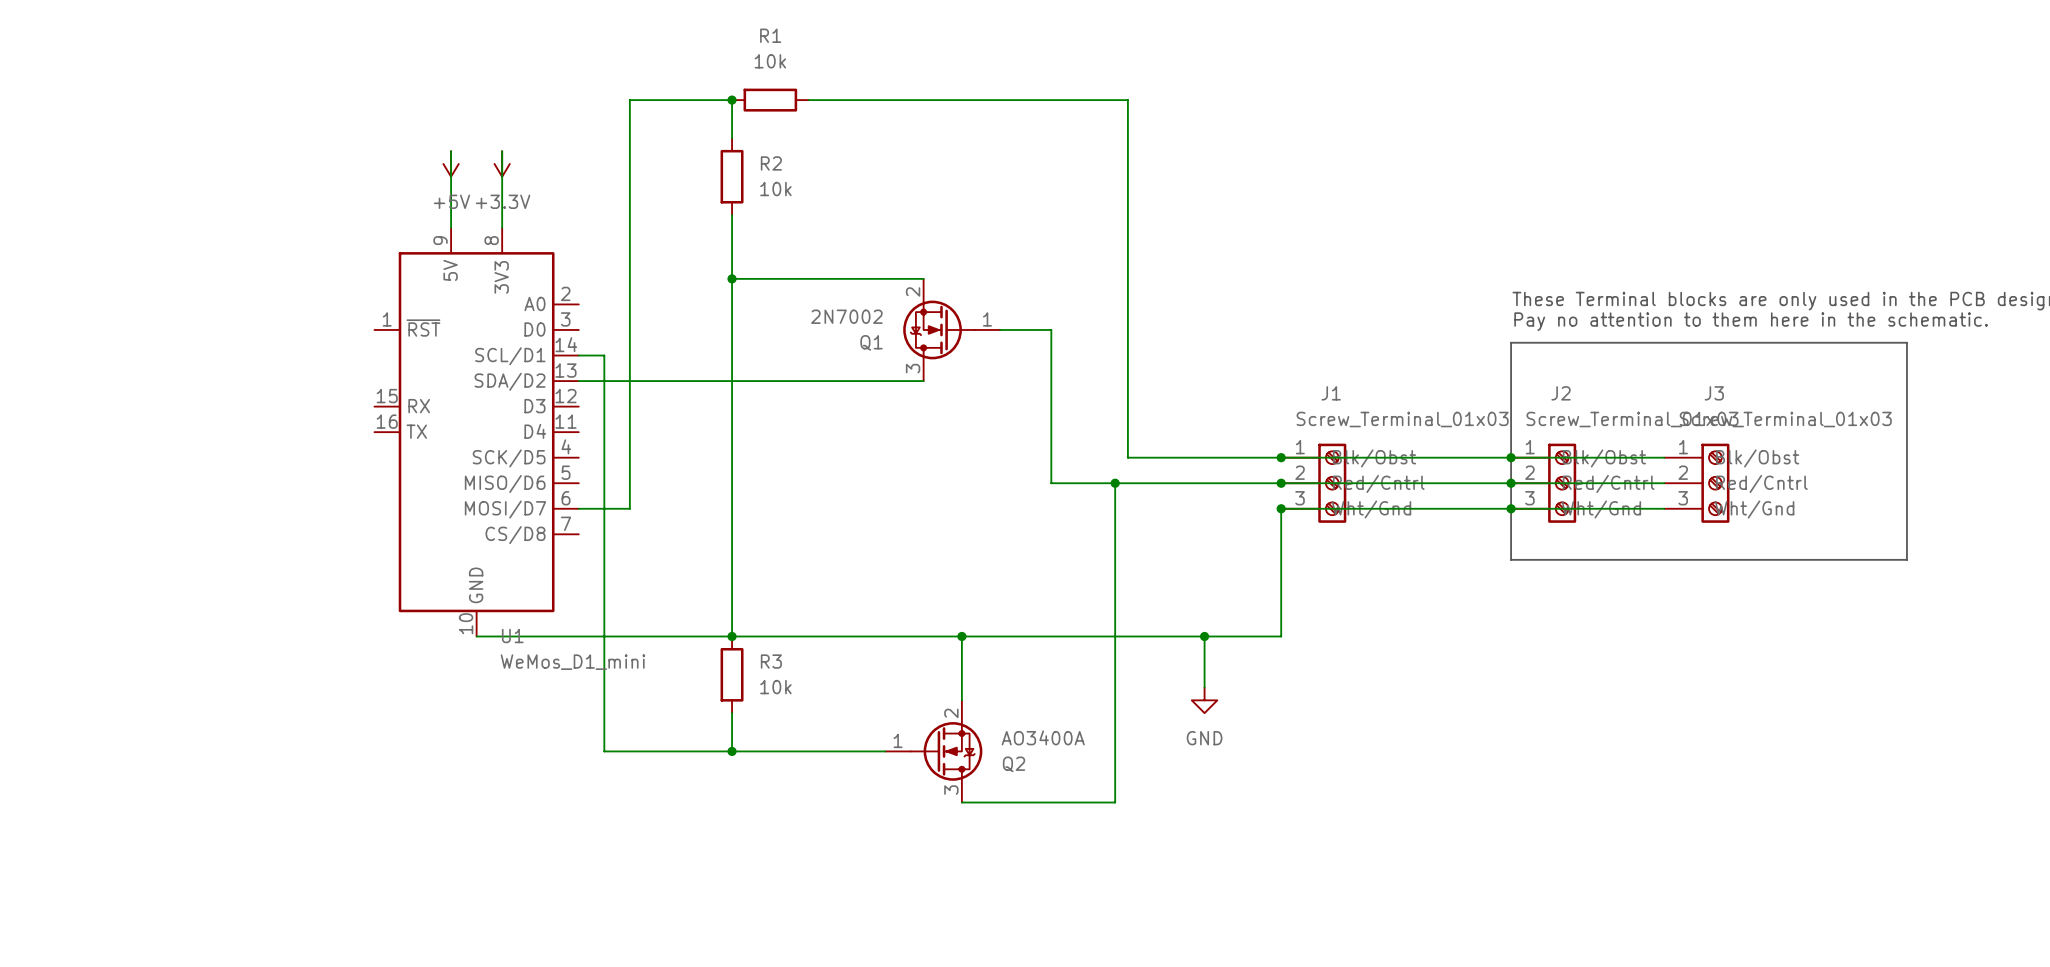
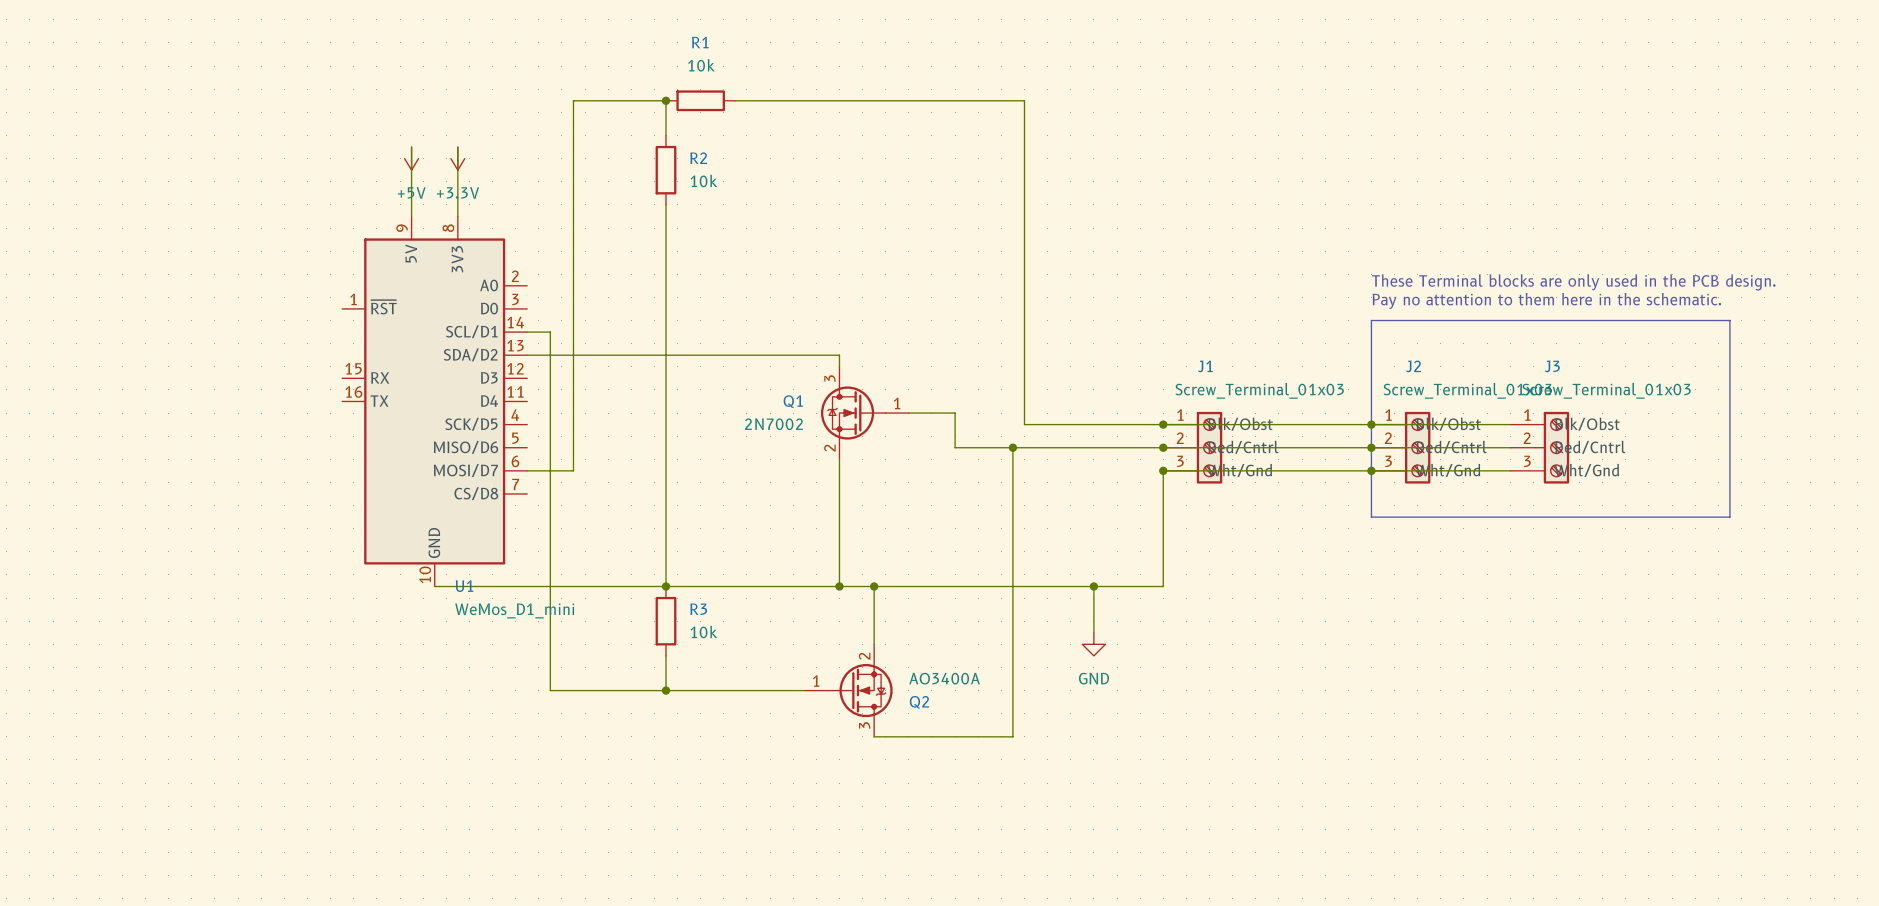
wire: (732, 278) (923, 278) -> none
junction: (732, 278) -> none
Q1 flip: as is (938, 329) -> up-down (853, 413)
Q1 position: (951, 329) -> (864, 413)
wire: (1000, 329) (1051, 329) (1051, 444) -> (908, 413) (955, 413)
wire: none -> (839, 355) (839, 366)
wire: none -> (839, 459) (839, 586)
junction: none -> (839, 586)

